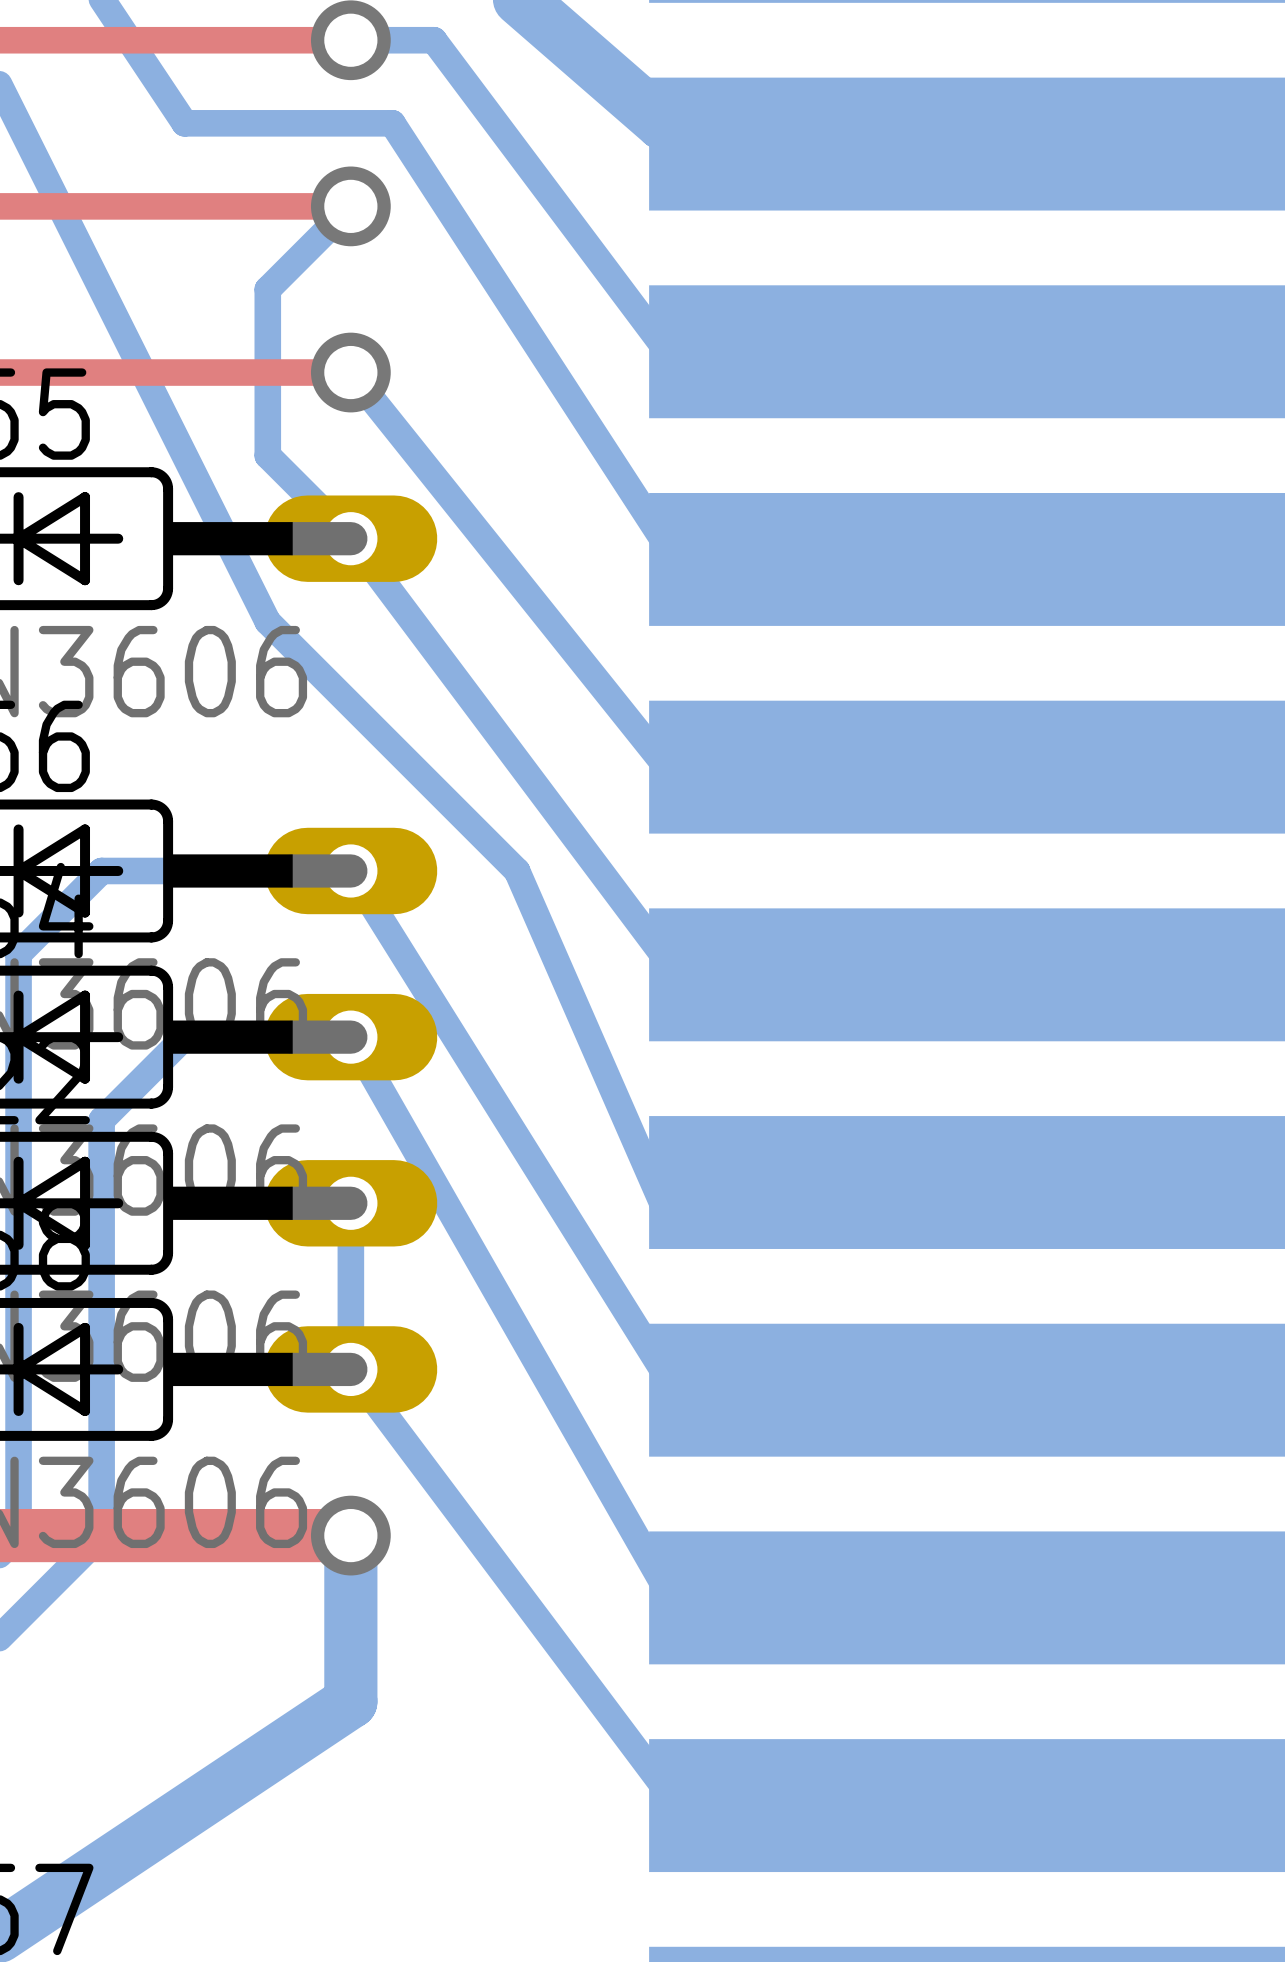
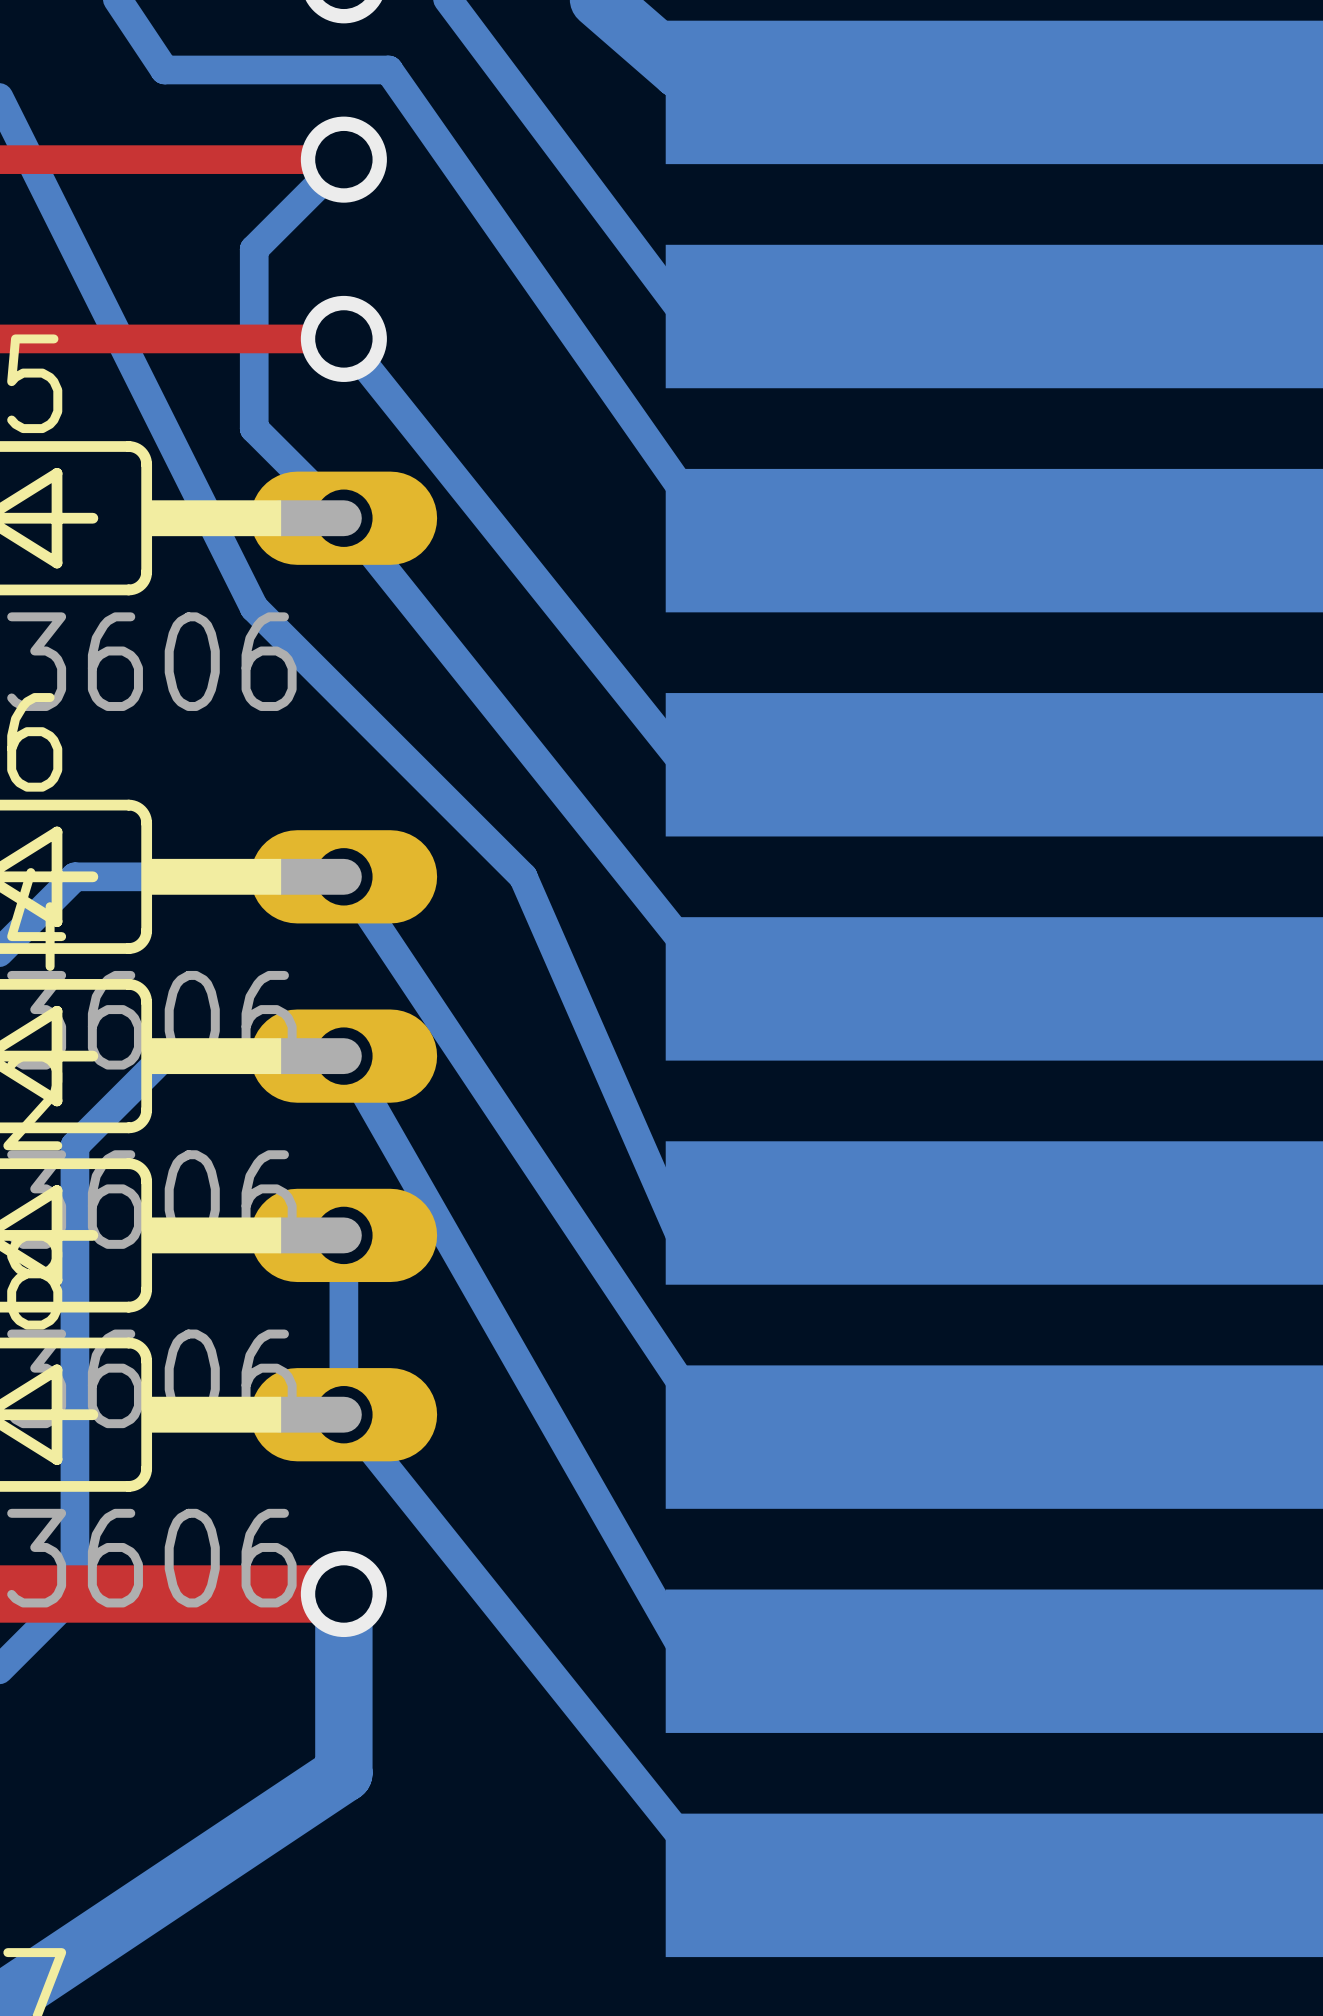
bottom track: (392, 123) (662, 538) (1077, 559) -> (388, 69) (702, 518) (1128, 540)
bottom track: (350, 538) (662, 954) (1077, 974) -> (343, 518) (702, 966) (1128, 988)
bottom track: (350, 870) (662, 1369) (1077, 1390) -> (343, 876) (702, 1414) (1128, 1437)
bottom track: (350, 1369) (662, 1784) (1077, 1805) -> (343, 1414) (702, 1862) (1128, 1885)

